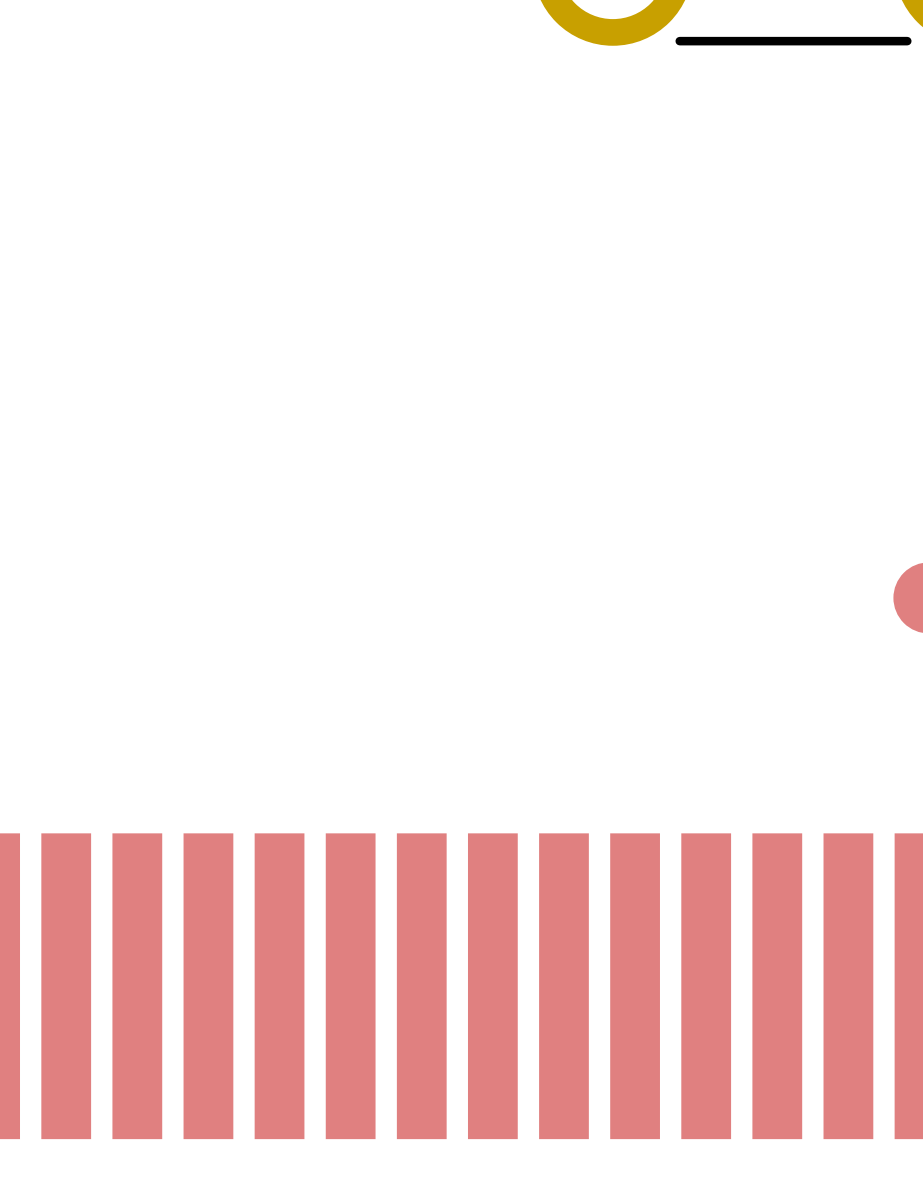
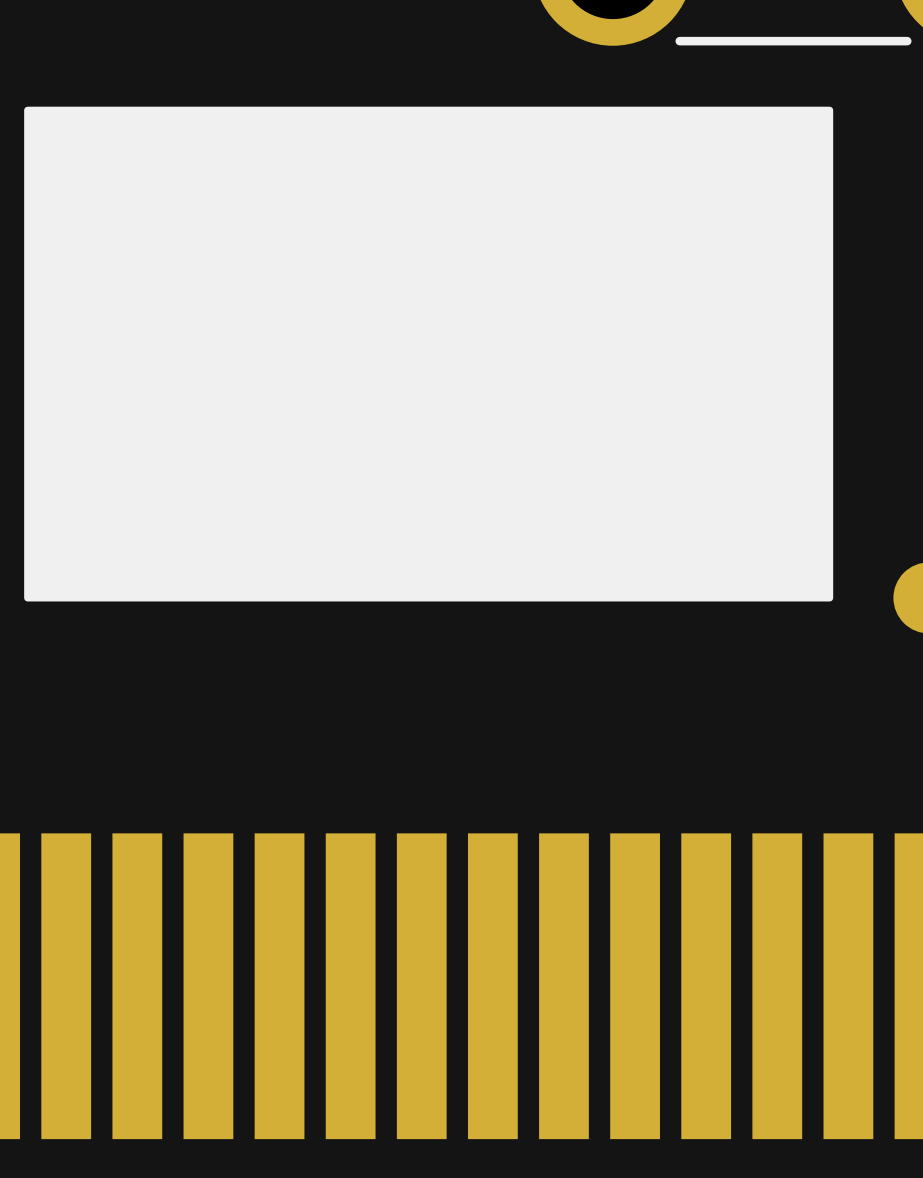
drawing: none -> [24, 106, 834, 602]

